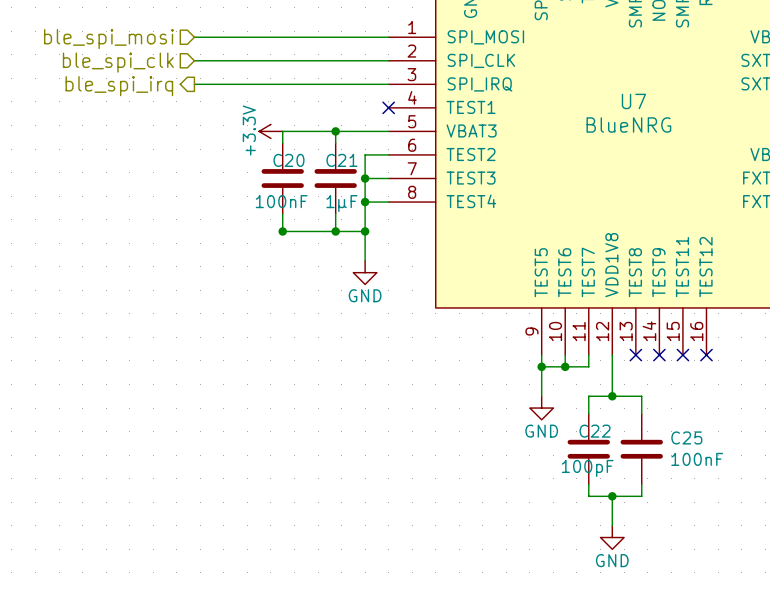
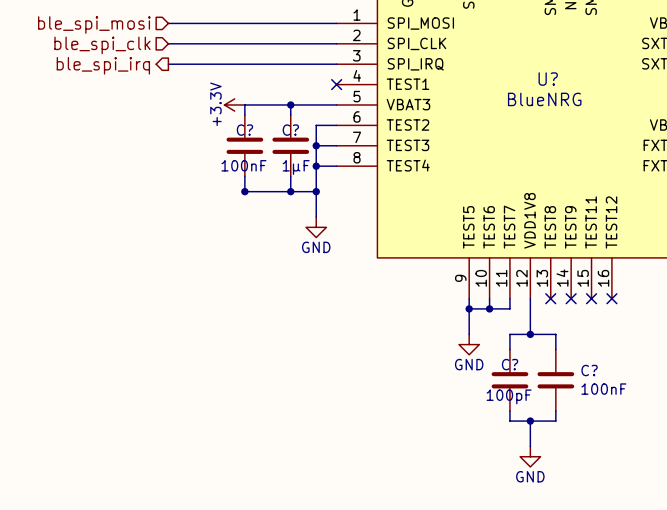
U7 name: U7 (633, 101) -> U? (548, 79)
C20 name: C20 (288, 160) -> C? (244, 130)
C21 name: C21 (341, 160) -> C? (290, 130)
C22 name: C22 (595, 431) -> C? (510, 364)
C25 name: C25 (686, 437) -> C? (589, 370)

